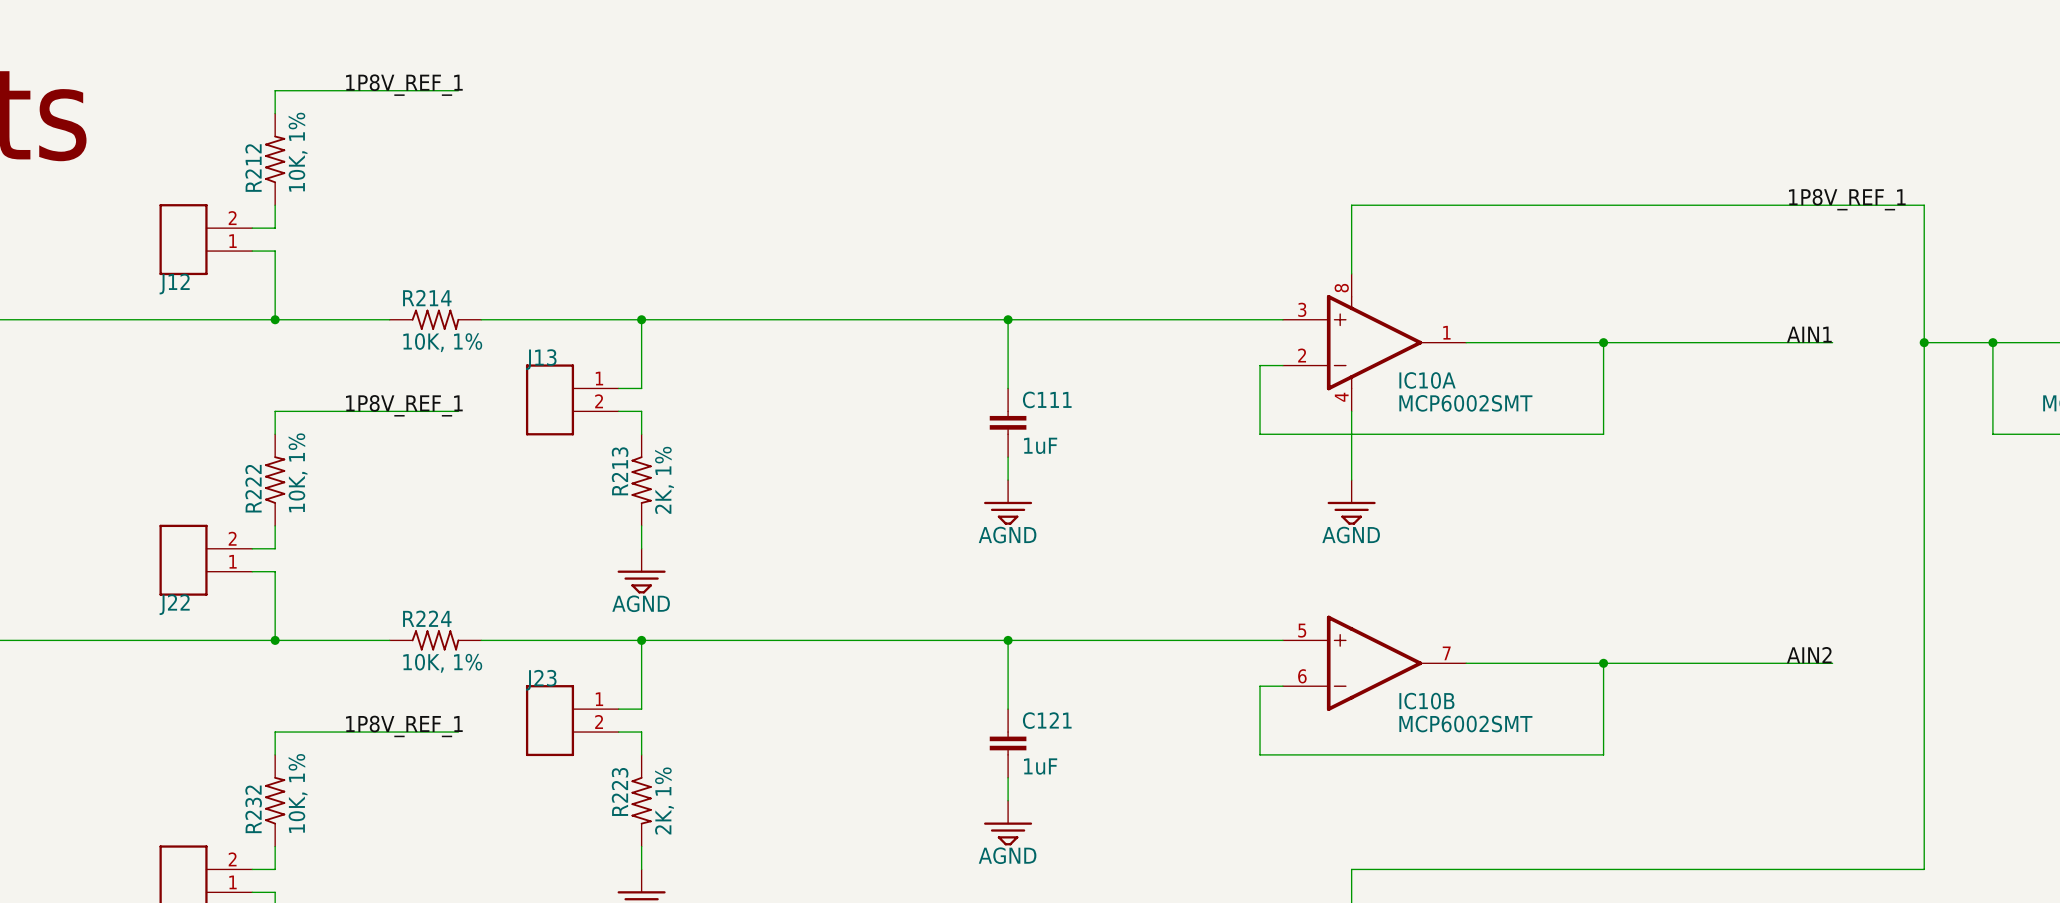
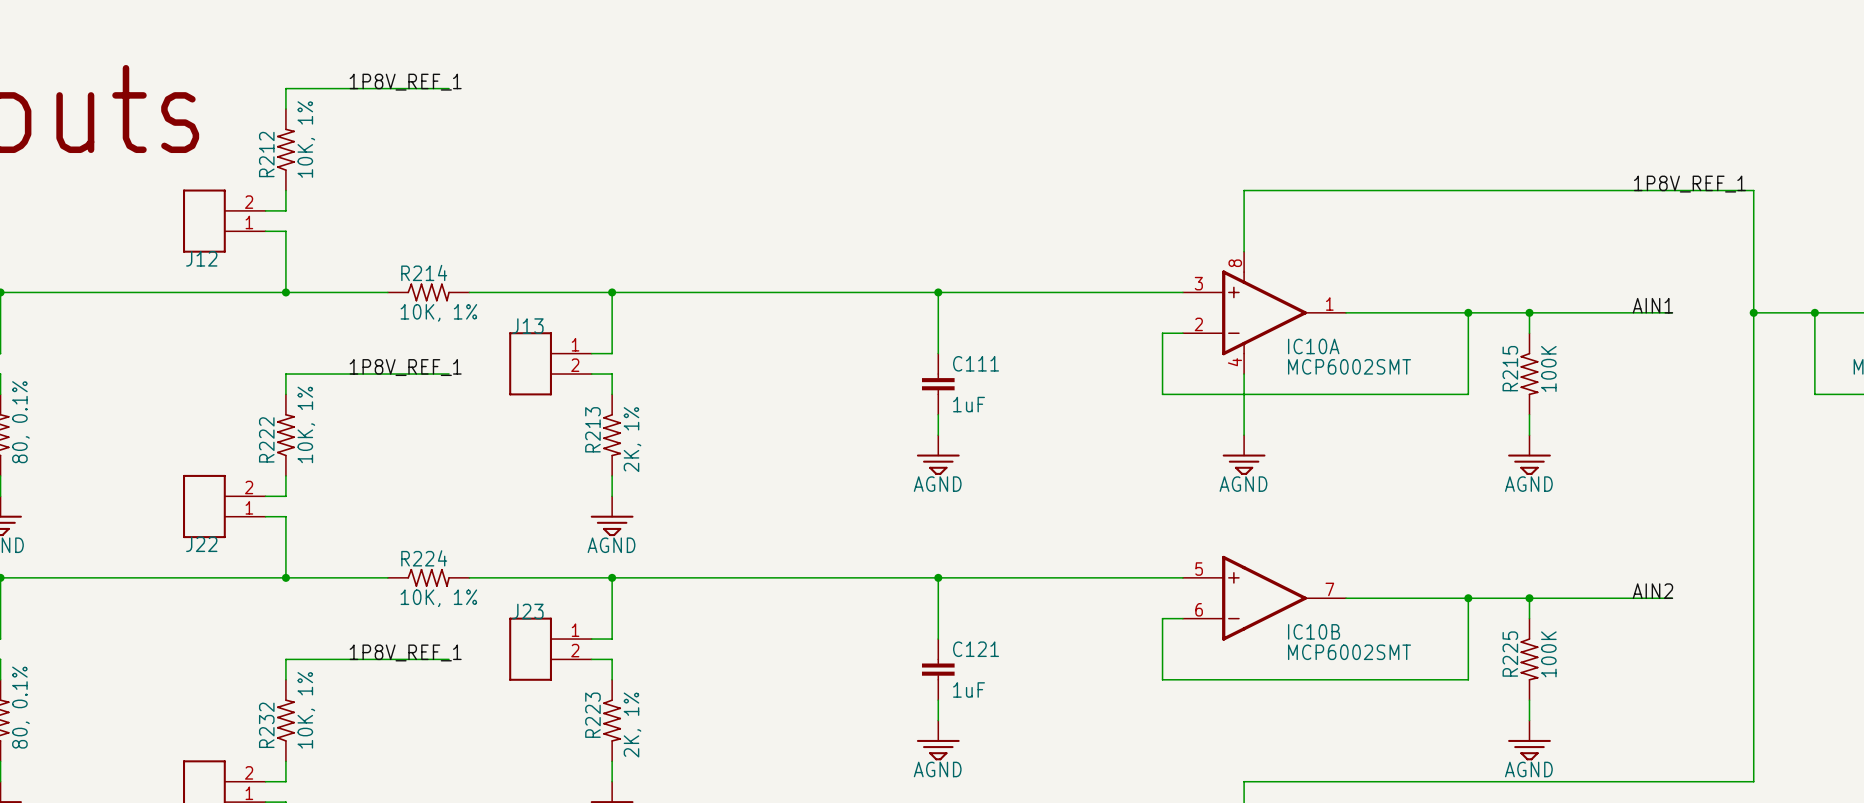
wire: none -> (1529, 312) (1529, 333)
junction: none -> (1529, 312)
R215: none -> 100K (1529, 374)
wire: none -> (1529, 414) (1529, 435)
power symbol: none -> AGND (1529, 455)
wire: none -> (1529, 598) (1529, 618)
junction: none -> (1529, 598)
R225: none -> 100K (1529, 659)
wire: none -> (1529, 700) (1529, 720)
power symbol: none -> AGND (1529, 740)

